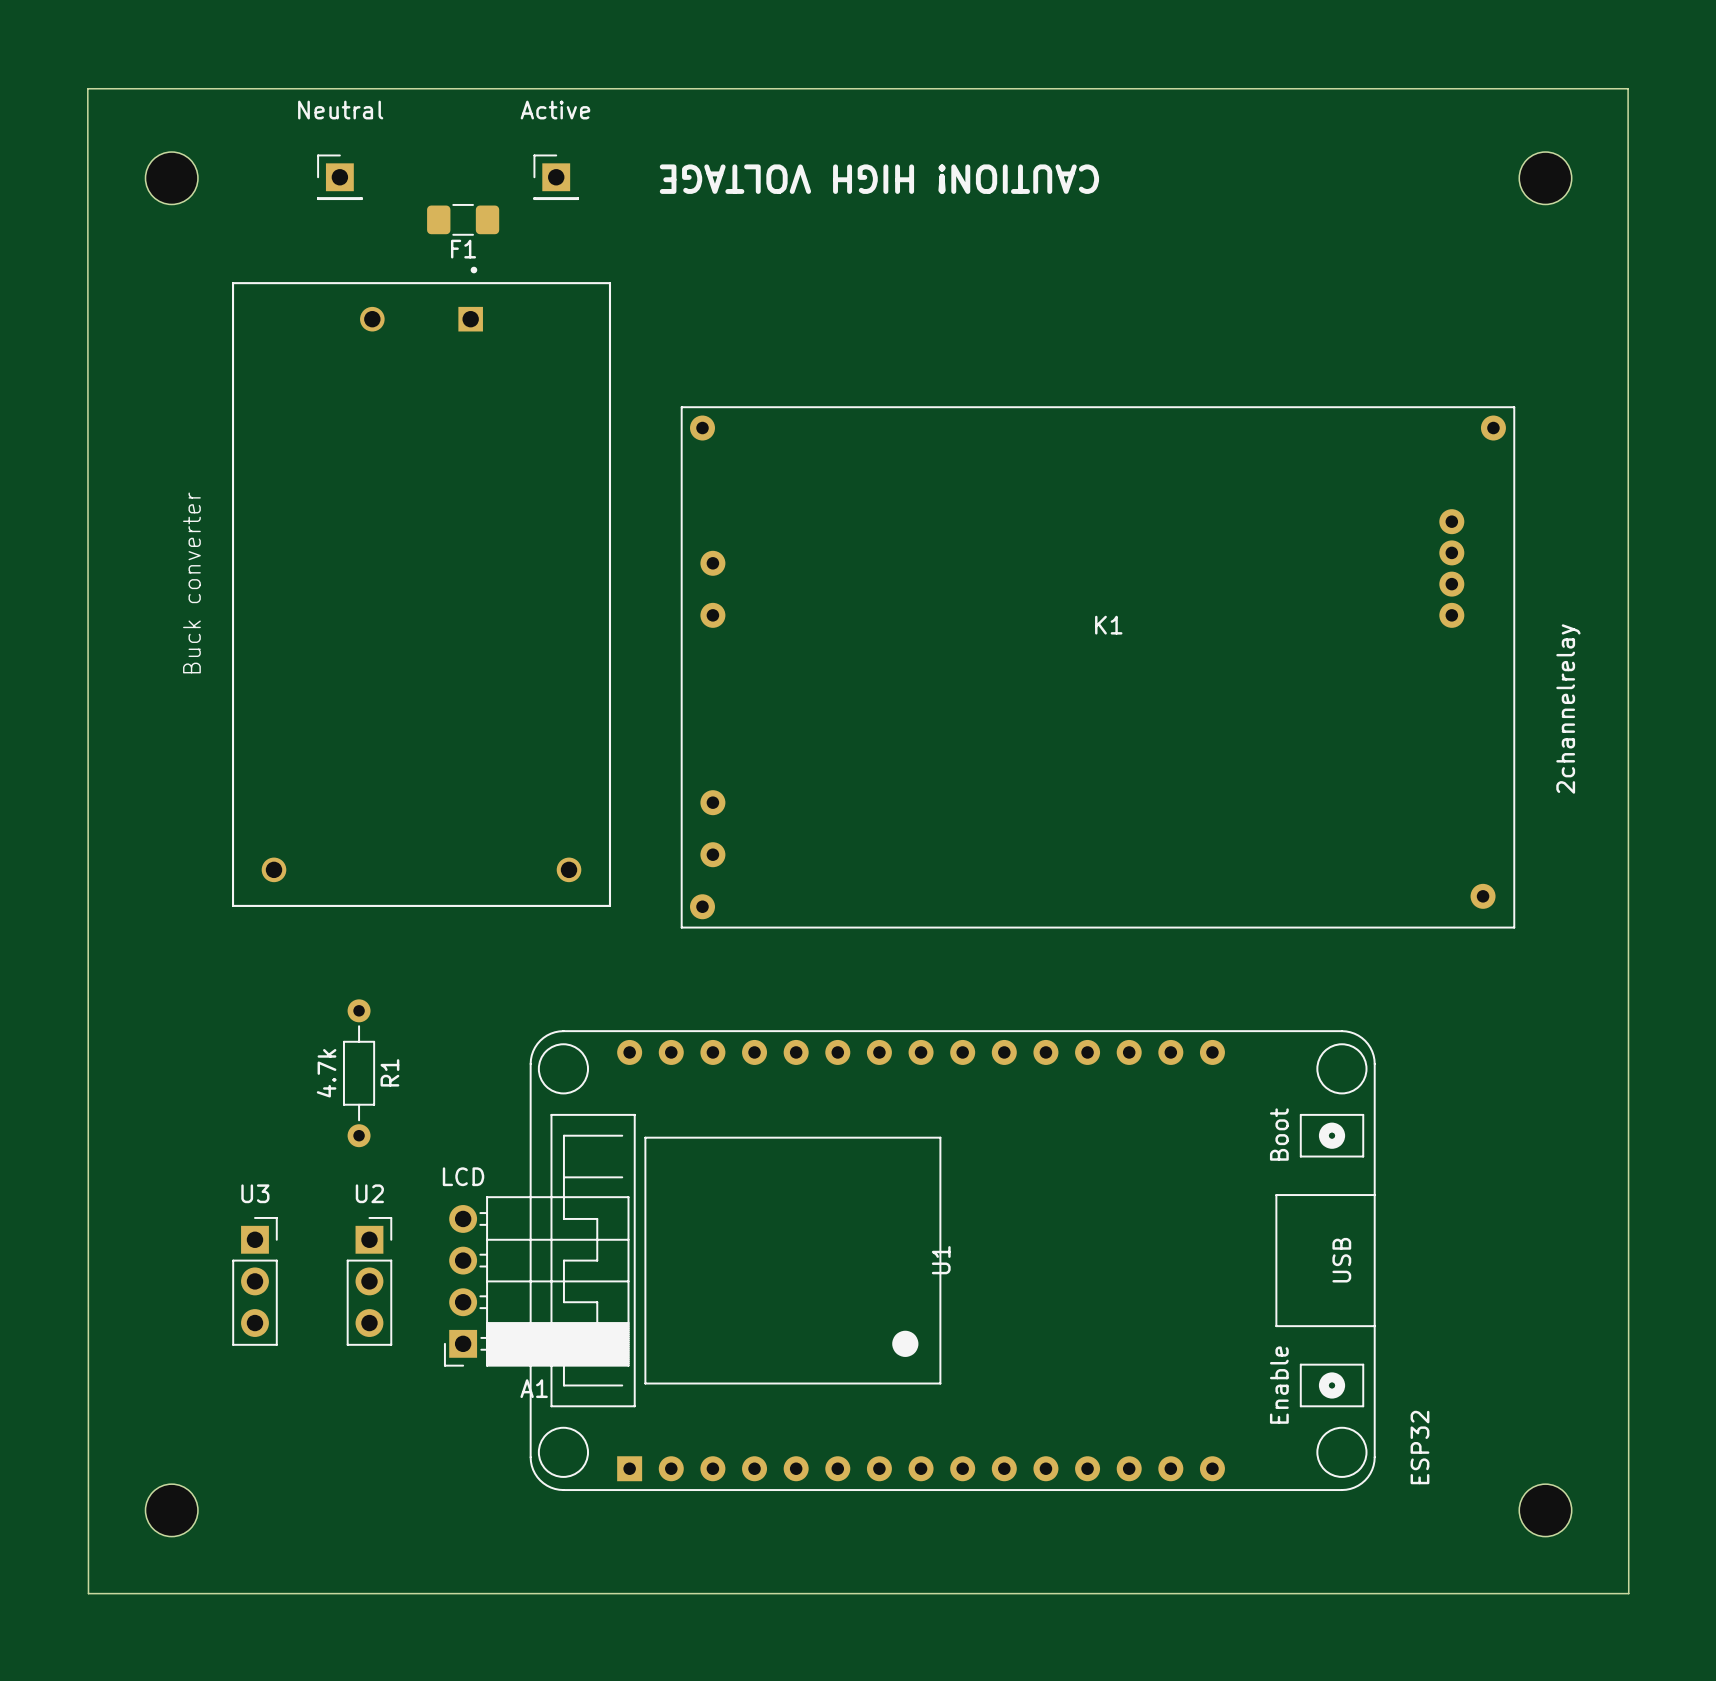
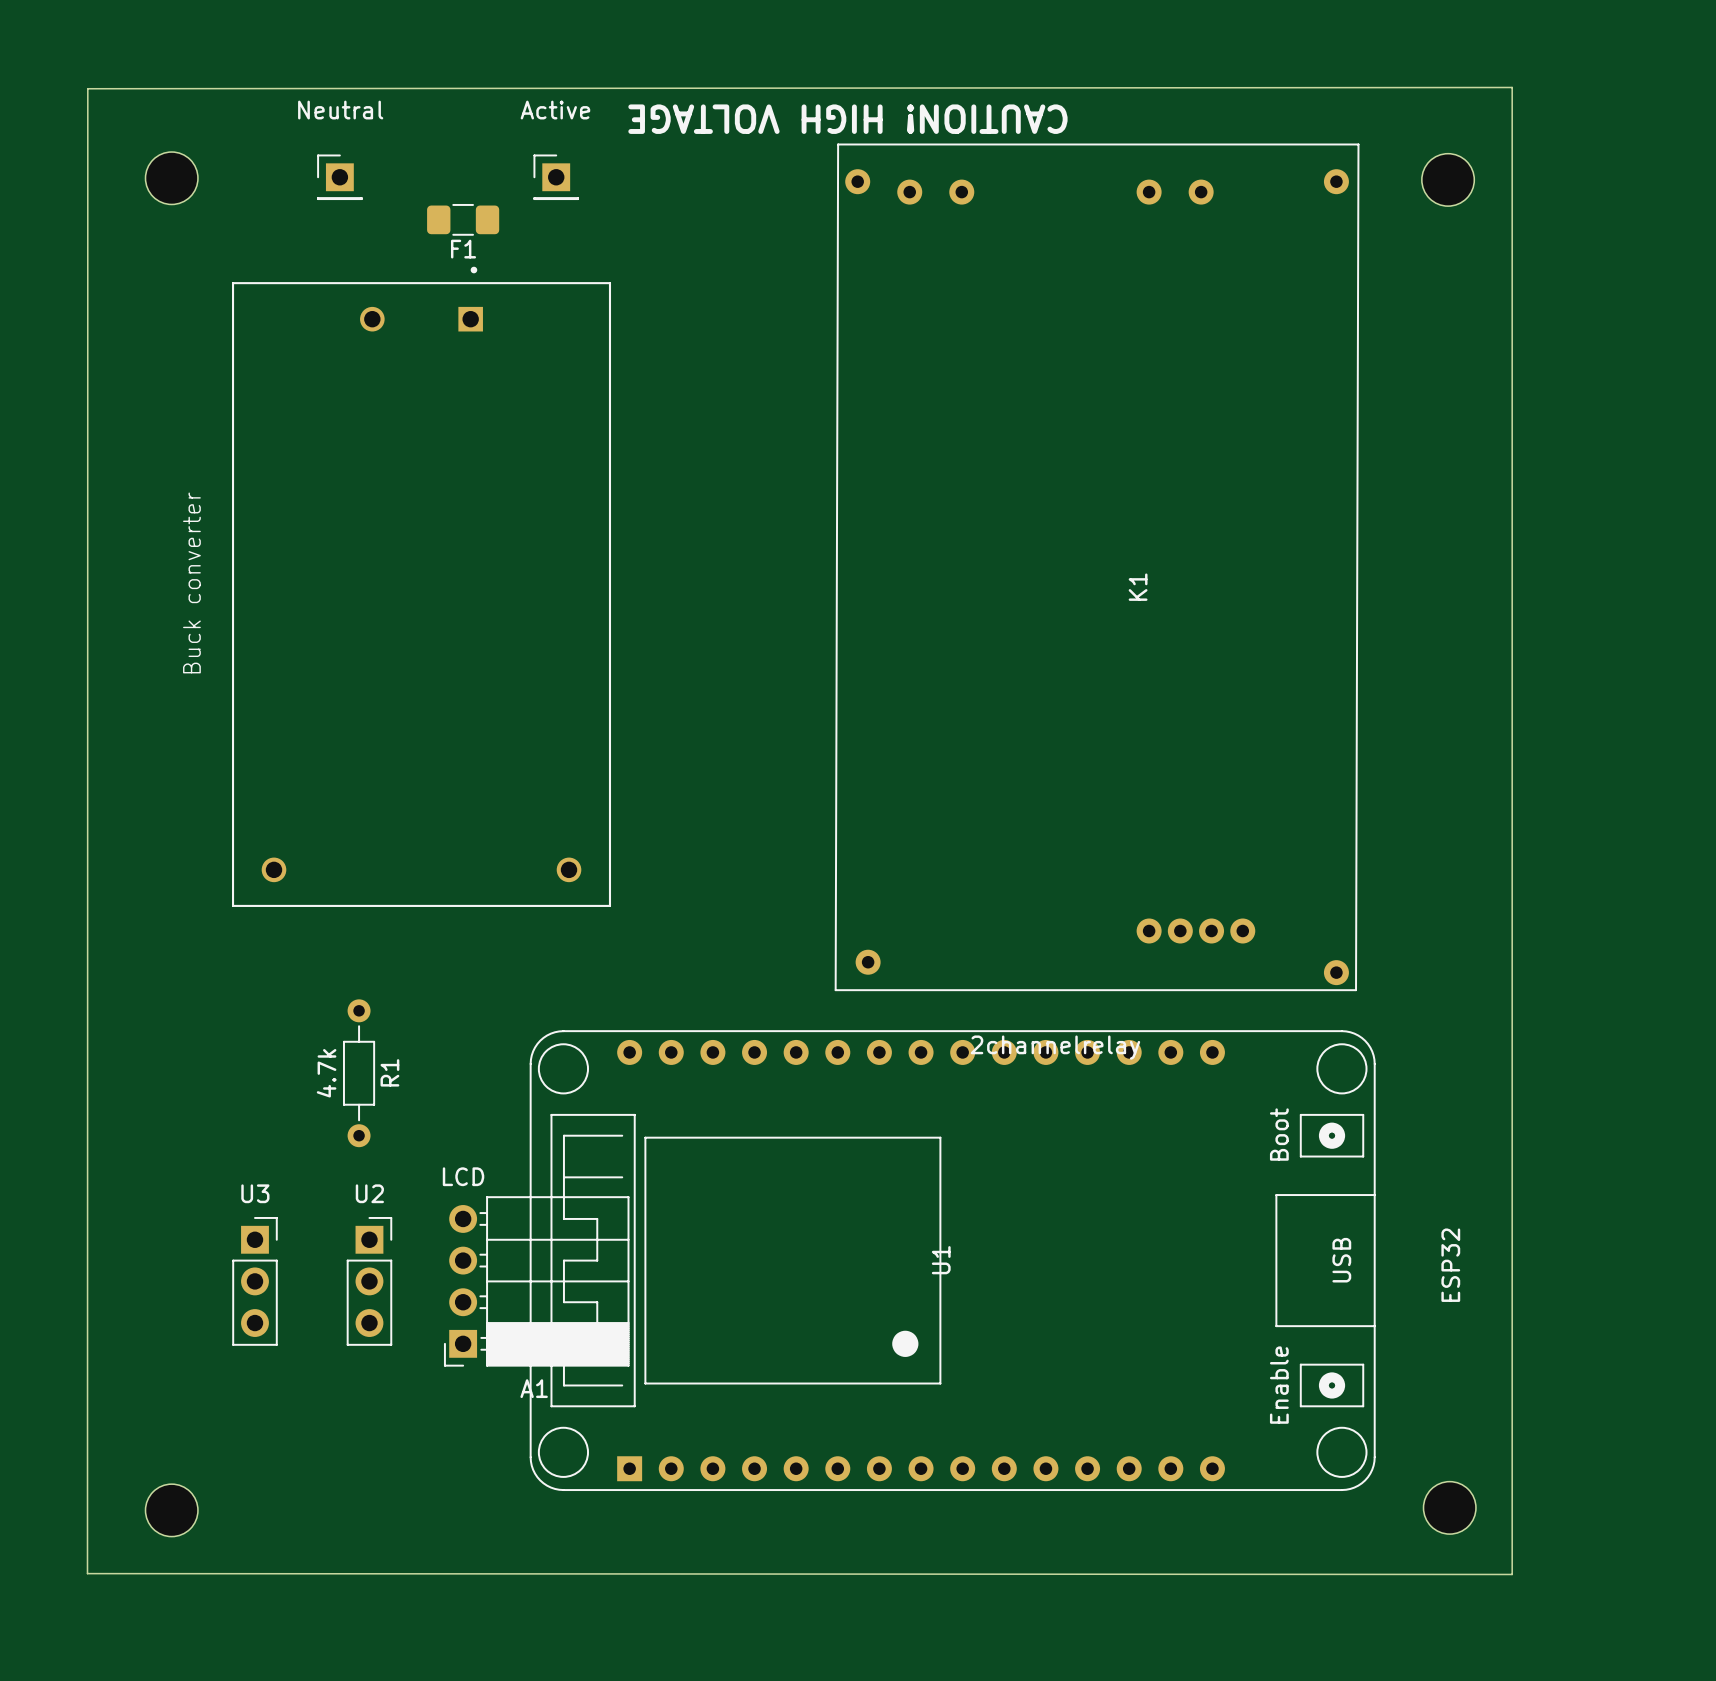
board edge: (87, 88) (1628, 88) (1628, 1593) (88, 1593) (87, 88) -> (1512, 87) (87, 88) (87, 1573) (1512, 1574) (1512, 87)
line: none -> (838, 144) (835, 990) (1356, 990) (1358, 144) (838, 144)
part position: (1545, 178) -> (1448, 179)
text position: CAUTION! HIGH VOLTAGE (879, 179) -> CAUTION! HIGH VOLTAGE (847, 119)
line: (681, 407) (1514, 407) (1514, 927) (681, 927) (681, 407) -> none
K1 rotation: 0° (1097, 667) -> 90° clockwise (1097, 577)
text position: ESP32 (1419, 1447) -> ESP32 (1450, 1265)
part position: (1545, 1510) -> (1449, 1507)

